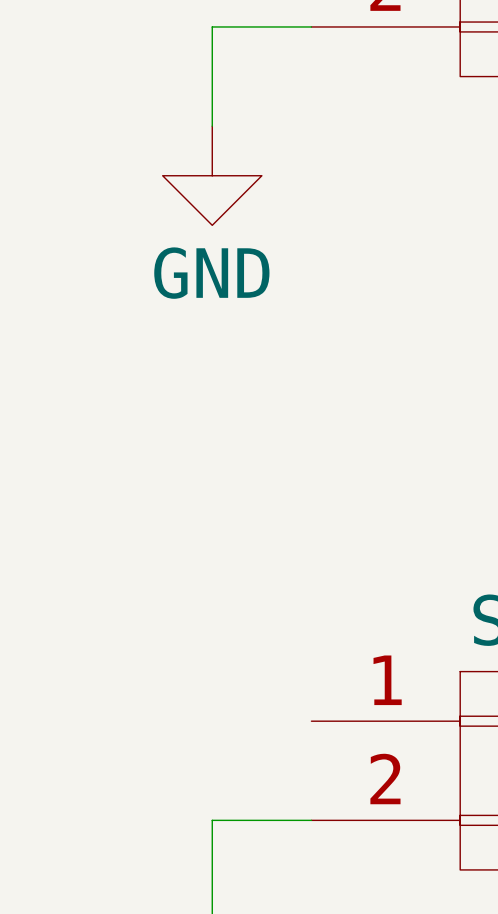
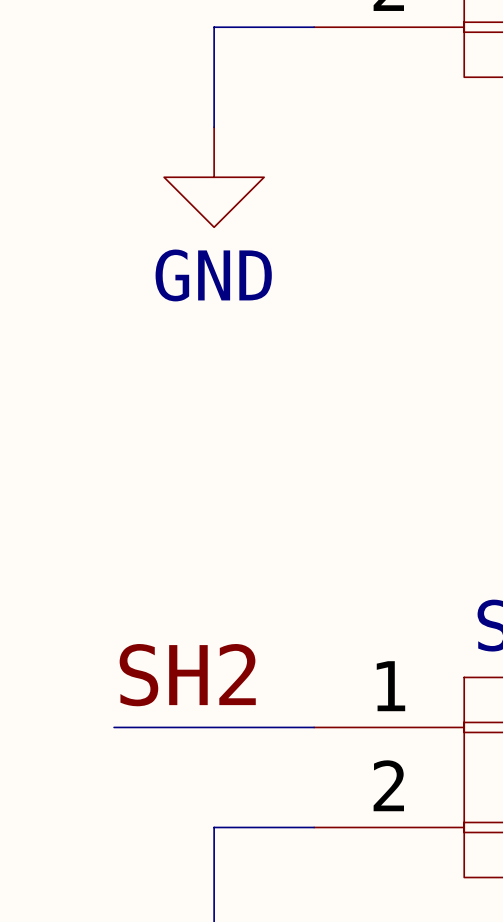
label: none -> SH2 (187, 675)
wire: none -> (114, 727) (314, 727)

